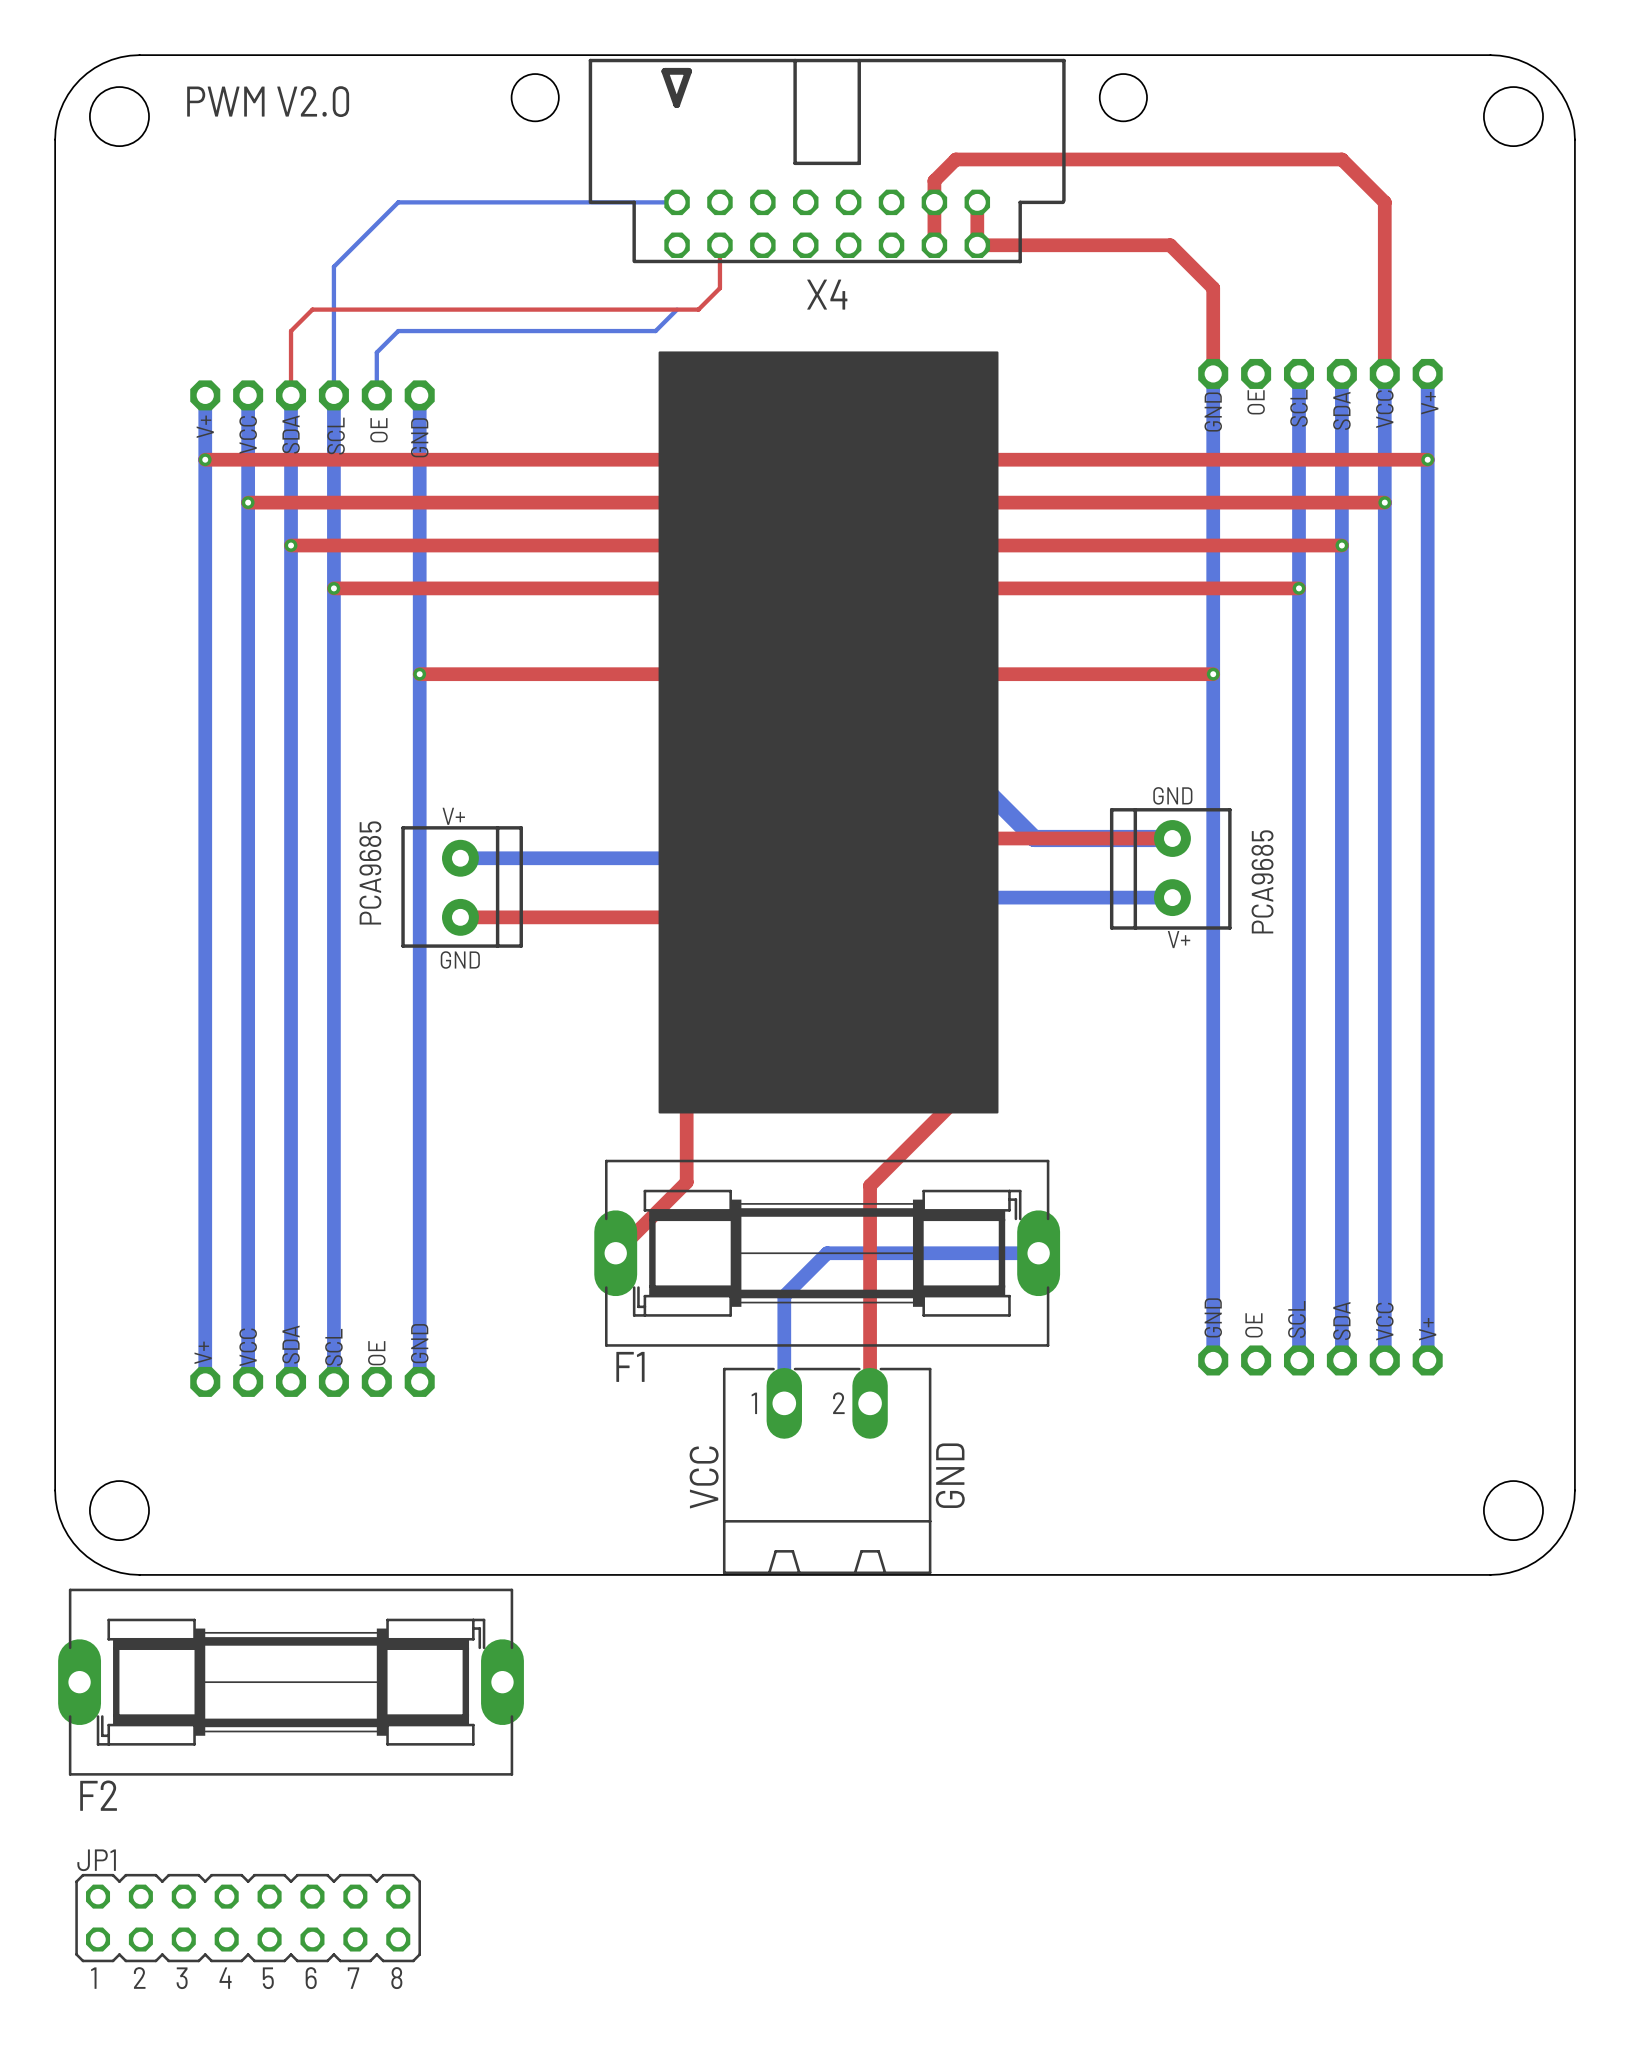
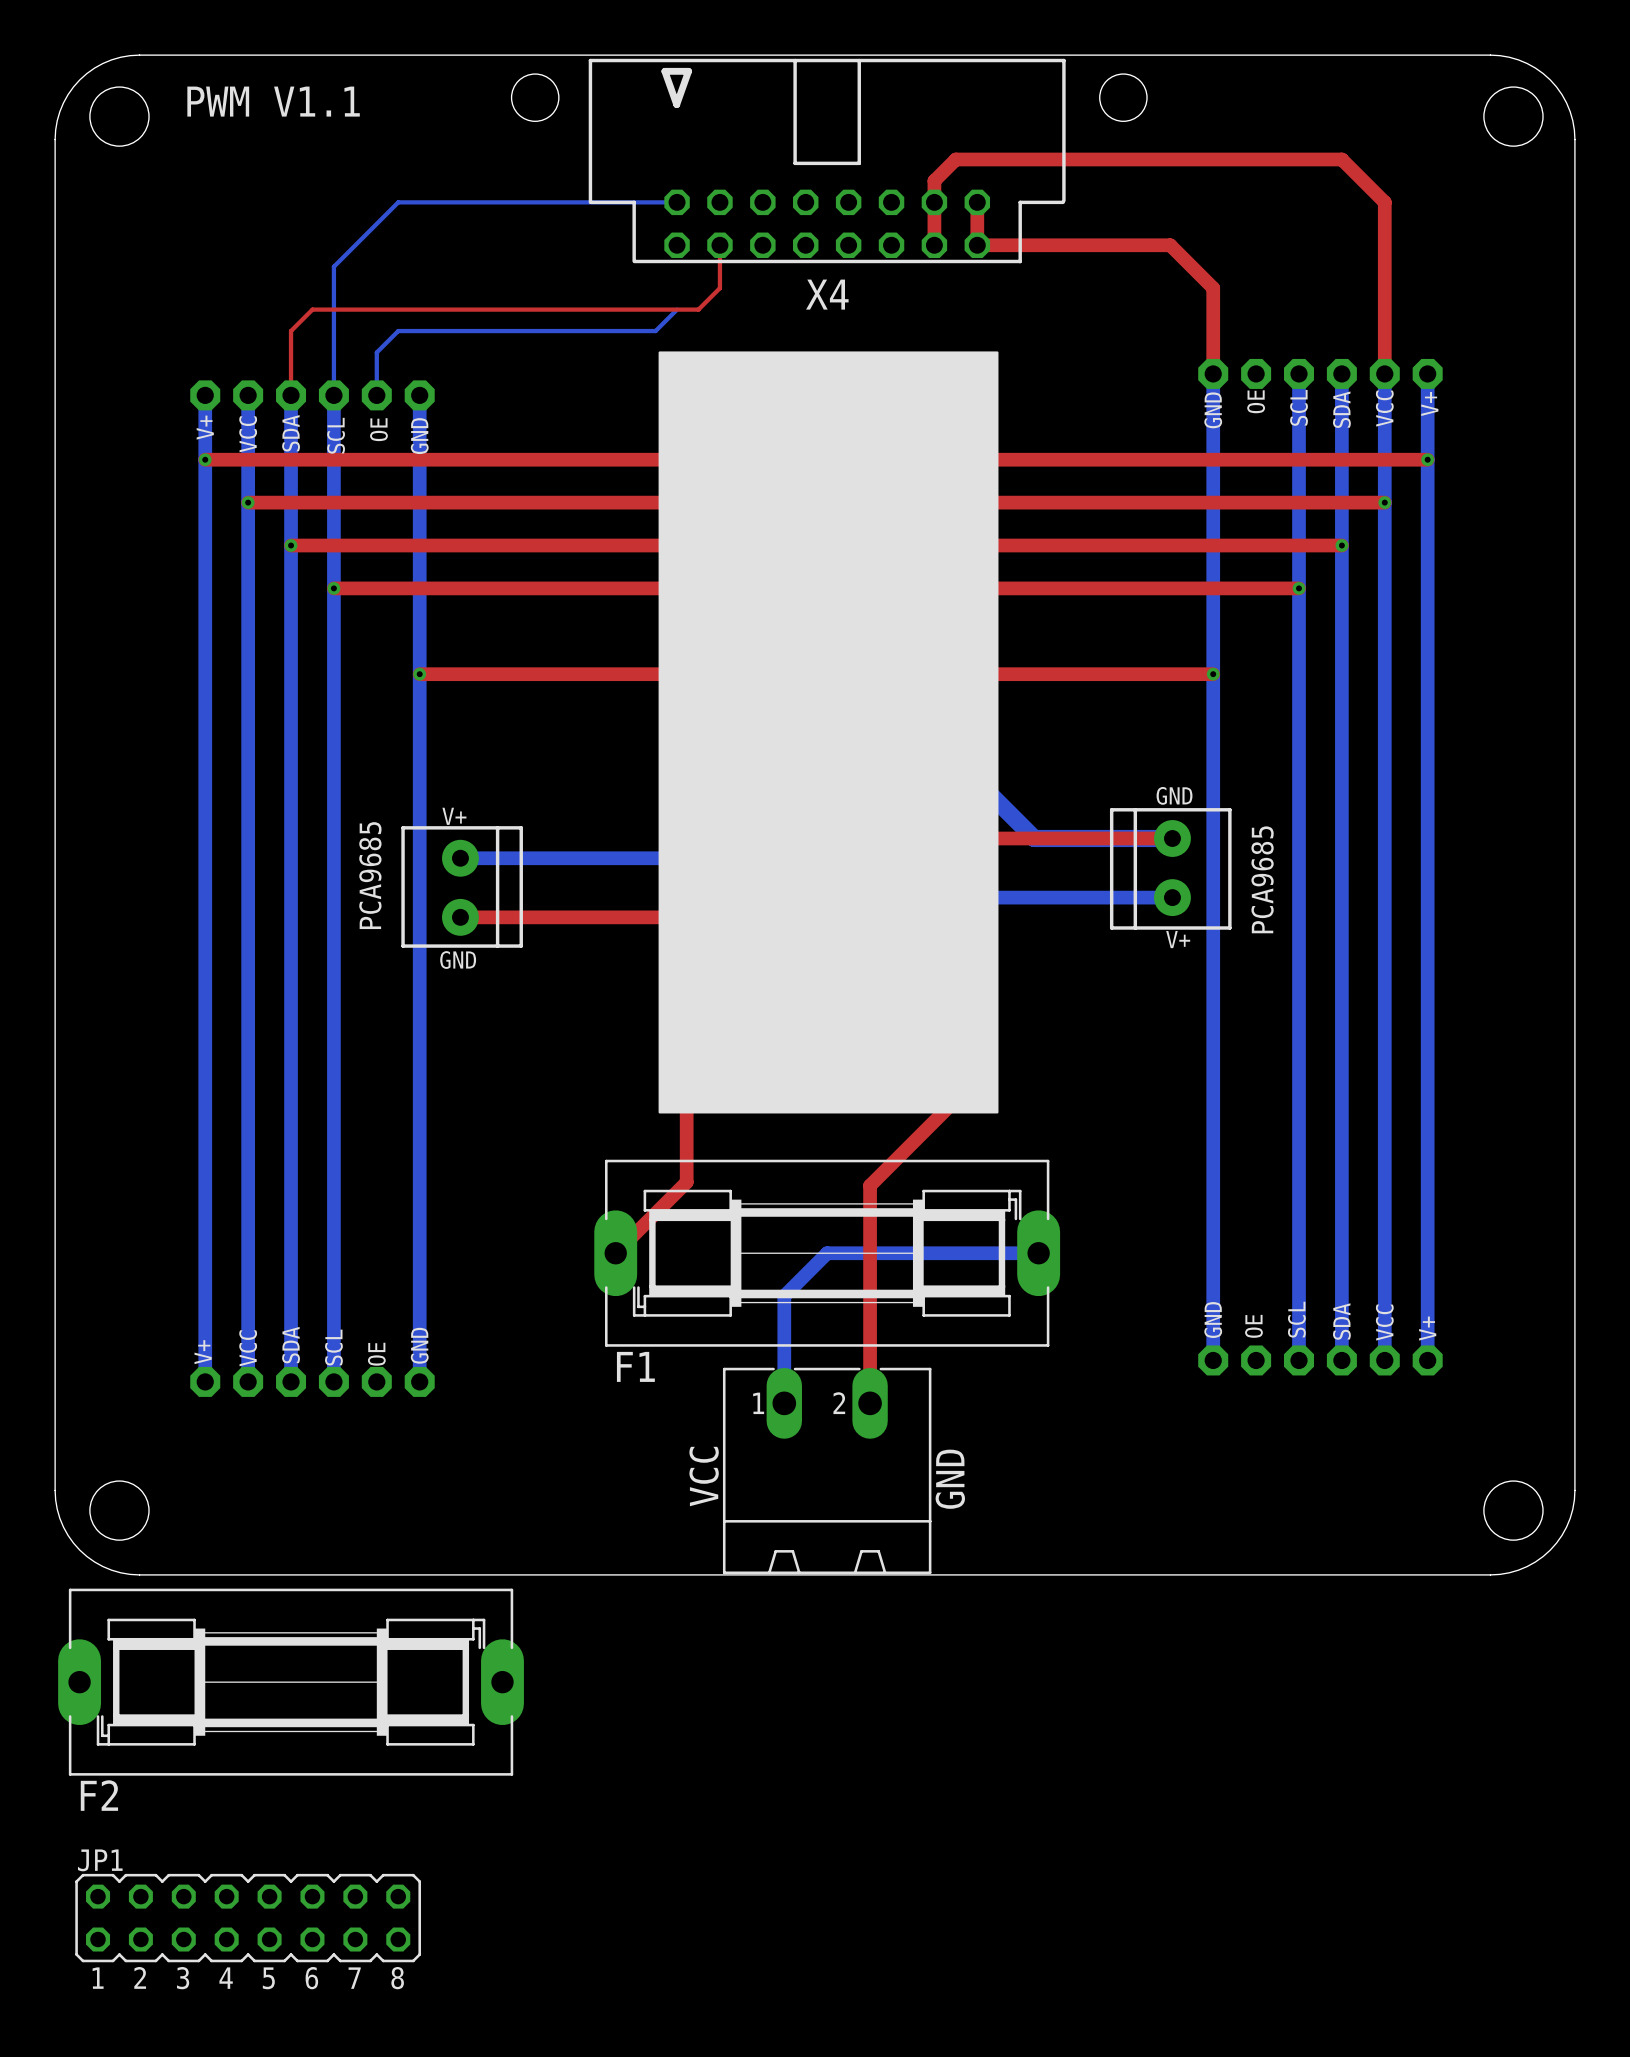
text: PWM V2.0 (268, 101) -> PWM V1.1 (273, 101)

